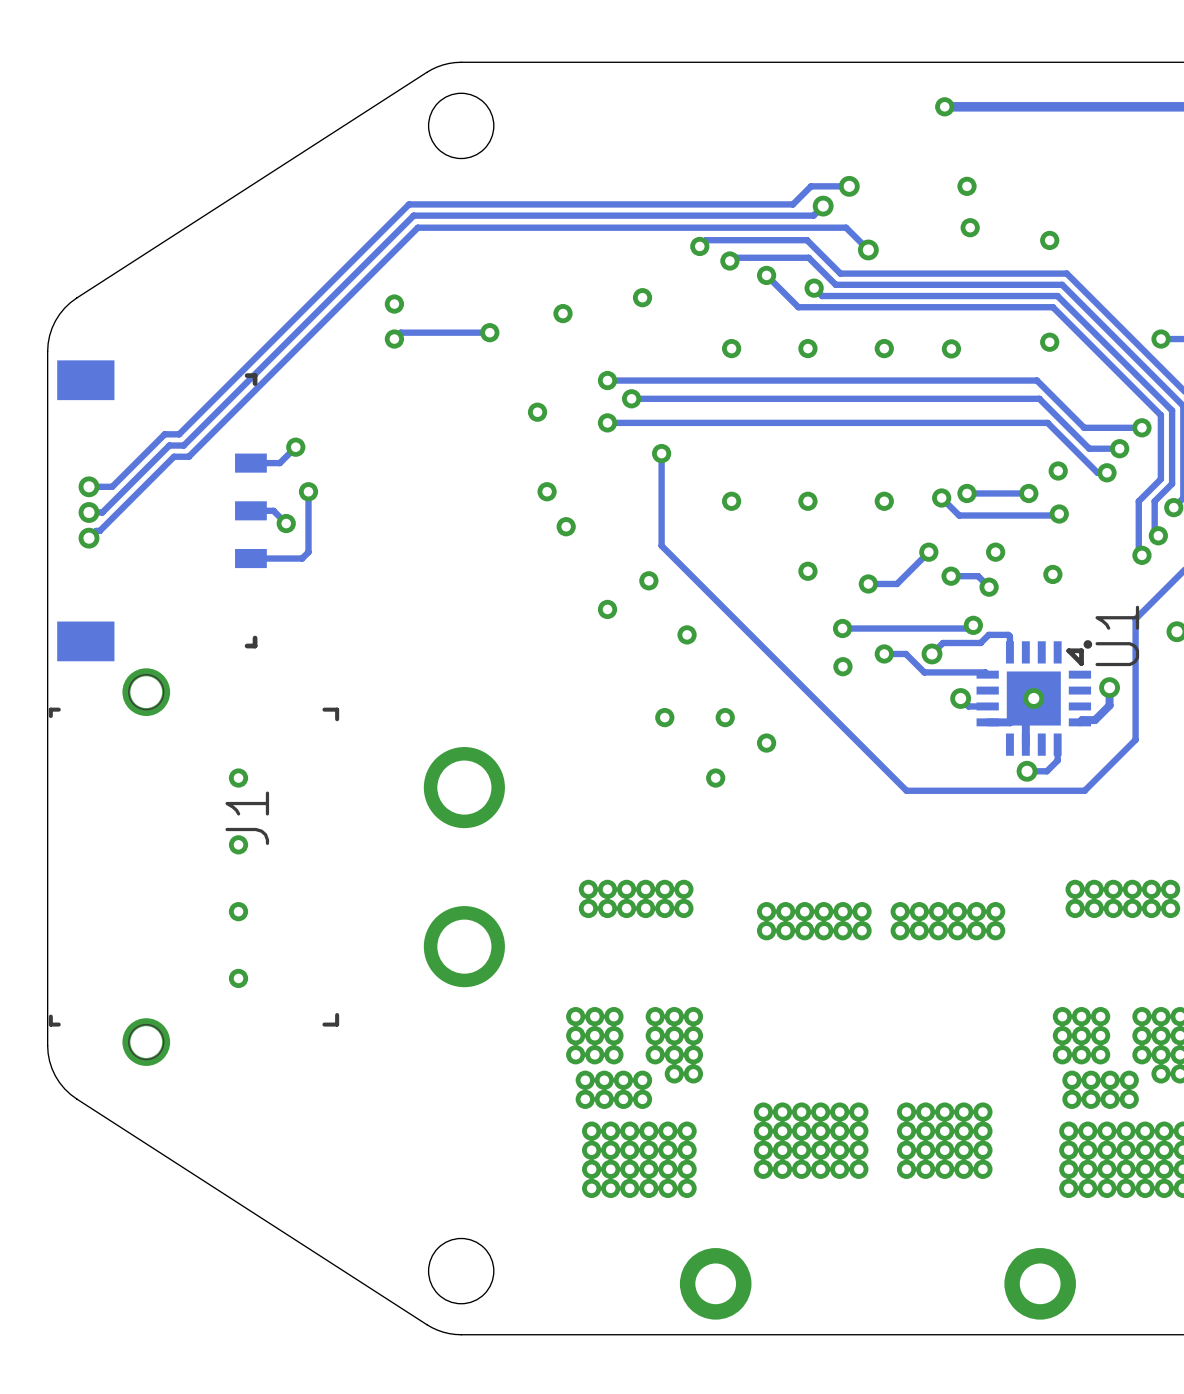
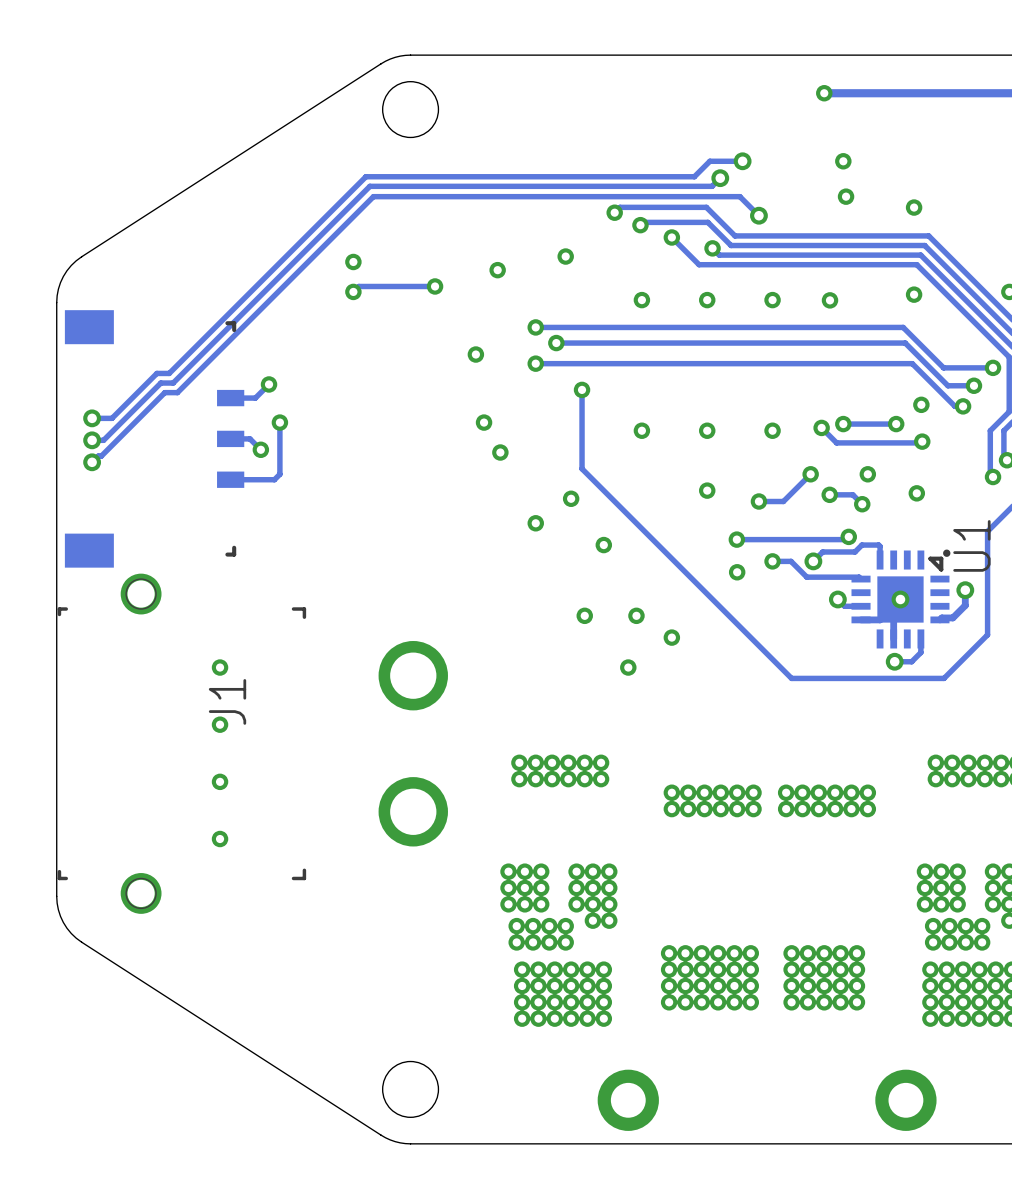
via: (766, 911) -> none
via: (785, 911) -> none
via: (804, 911) -> none
via: (823, 911) -> none
via: (842, 911) -> none
via: (862, 911) -> none
via: (900, 911) -> none
via: (919, 911) -> none
via: (938, 911) -> none
via: (957, 911) -> none
via: (976, 911) -> none
via: (995, 911) -> none
via: none -> (671, 792)
via: none -> (688, 792)
via: none -> (704, 792)
via: none -> (720, 792)
via: none -> (737, 792)
via: none -> (753, 792)
via: none -> (786, 792)
via: none -> (802, 792)
via: none -> (818, 792)
via: none -> (835, 792)
via: none -> (851, 792)
via: none -> (867, 792)
via: (766, 930) -> none
via: (785, 930) -> none
via: (804, 930) -> none
via: (823, 930) -> none
via: (842, 930) -> none
via: (862, 930) -> none
via: (900, 930) -> none
via: (919, 930) -> none
via: (938, 930) -> none
via: (957, 930) -> none
via: (976, 930) -> none
via: (995, 930) -> none
via: none -> (671, 809)
via: none -> (688, 809)
via: none -> (704, 809)
via: none -> (720, 809)
via: none -> (737, 809)
via: none -> (753, 809)
via: none -> (786, 809)
via: none -> (802, 809)
via: none -> (818, 809)
via: none -> (835, 809)
via: none -> (851, 809)
via: none -> (867, 809)

